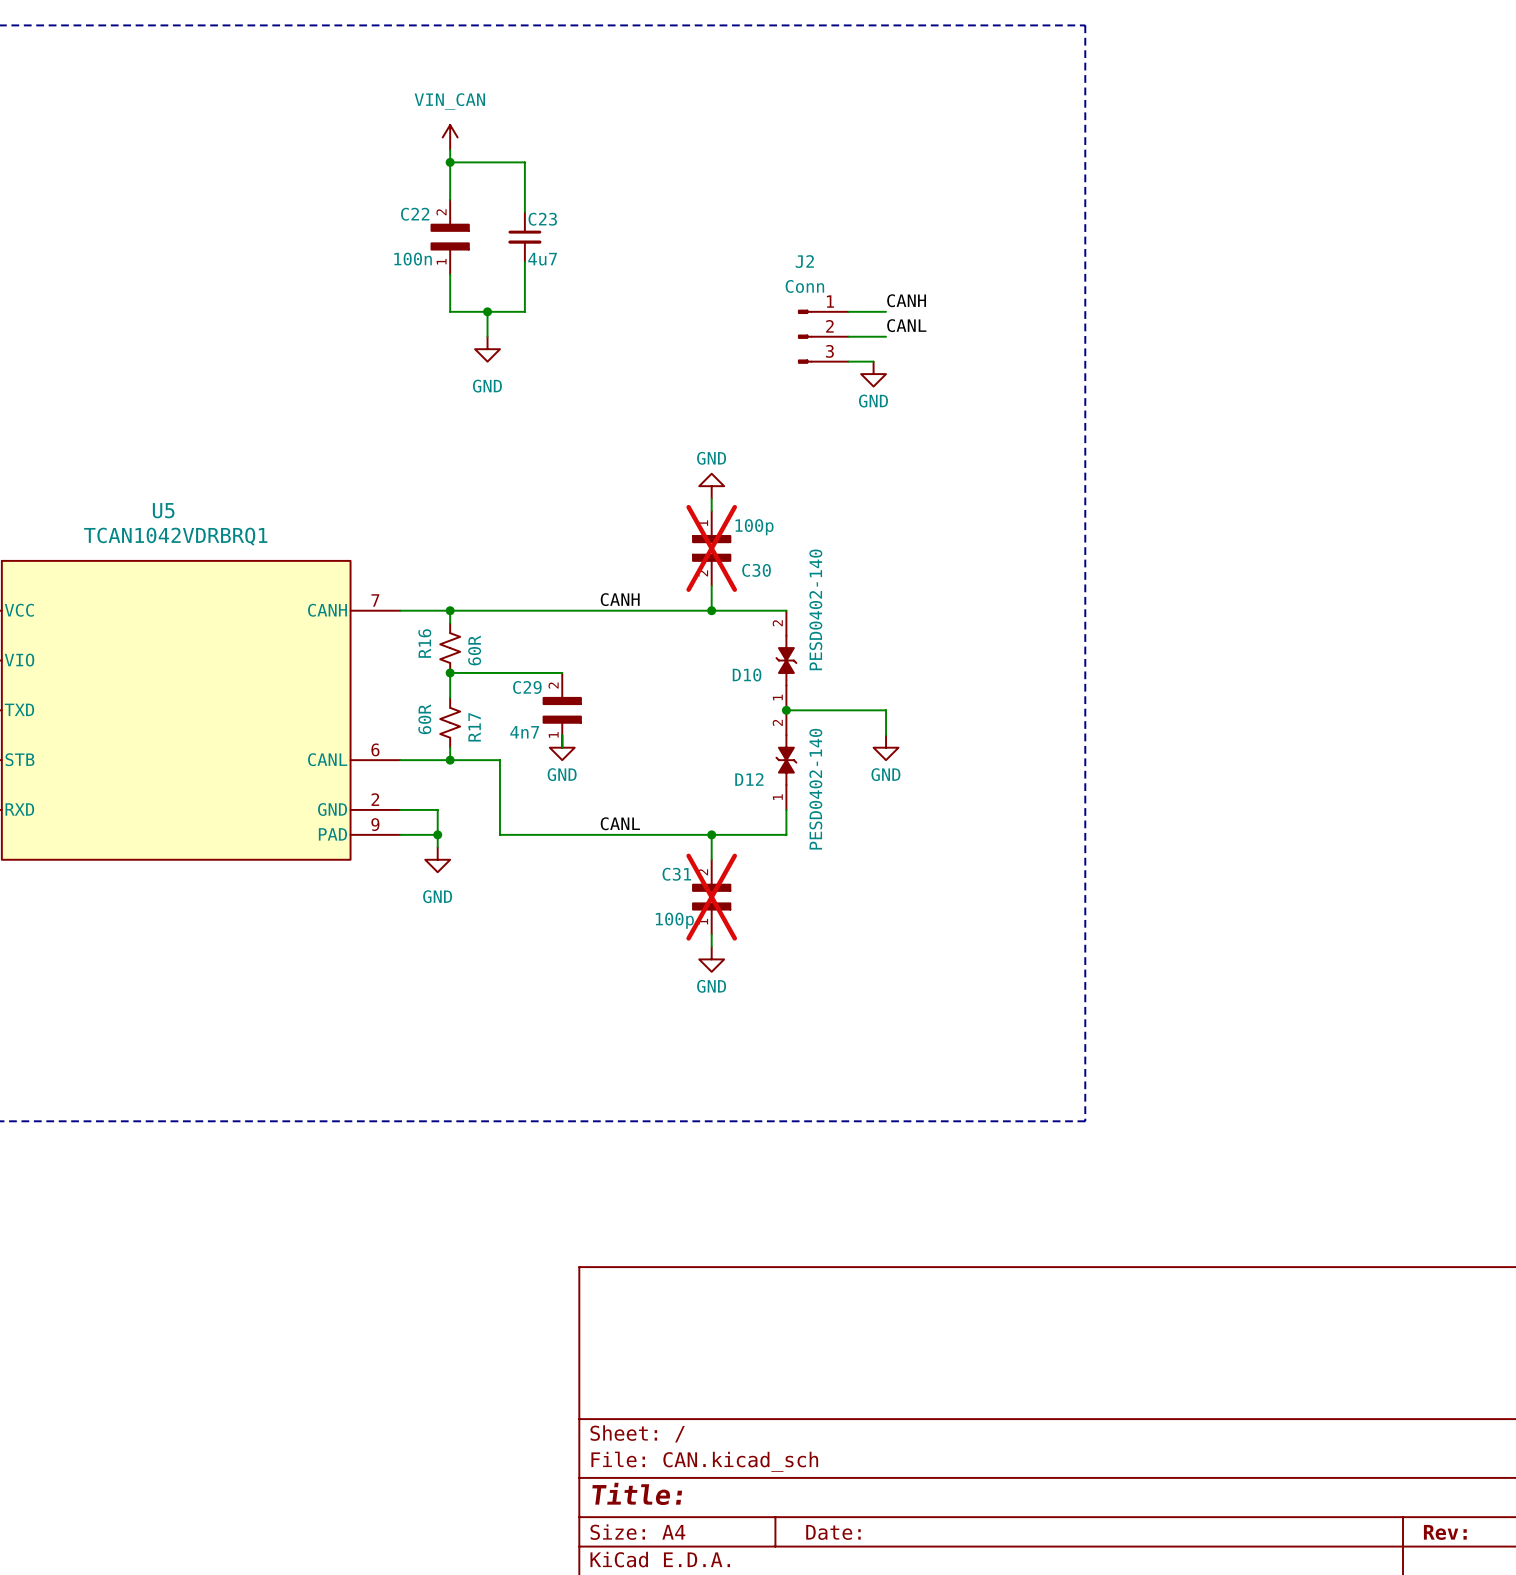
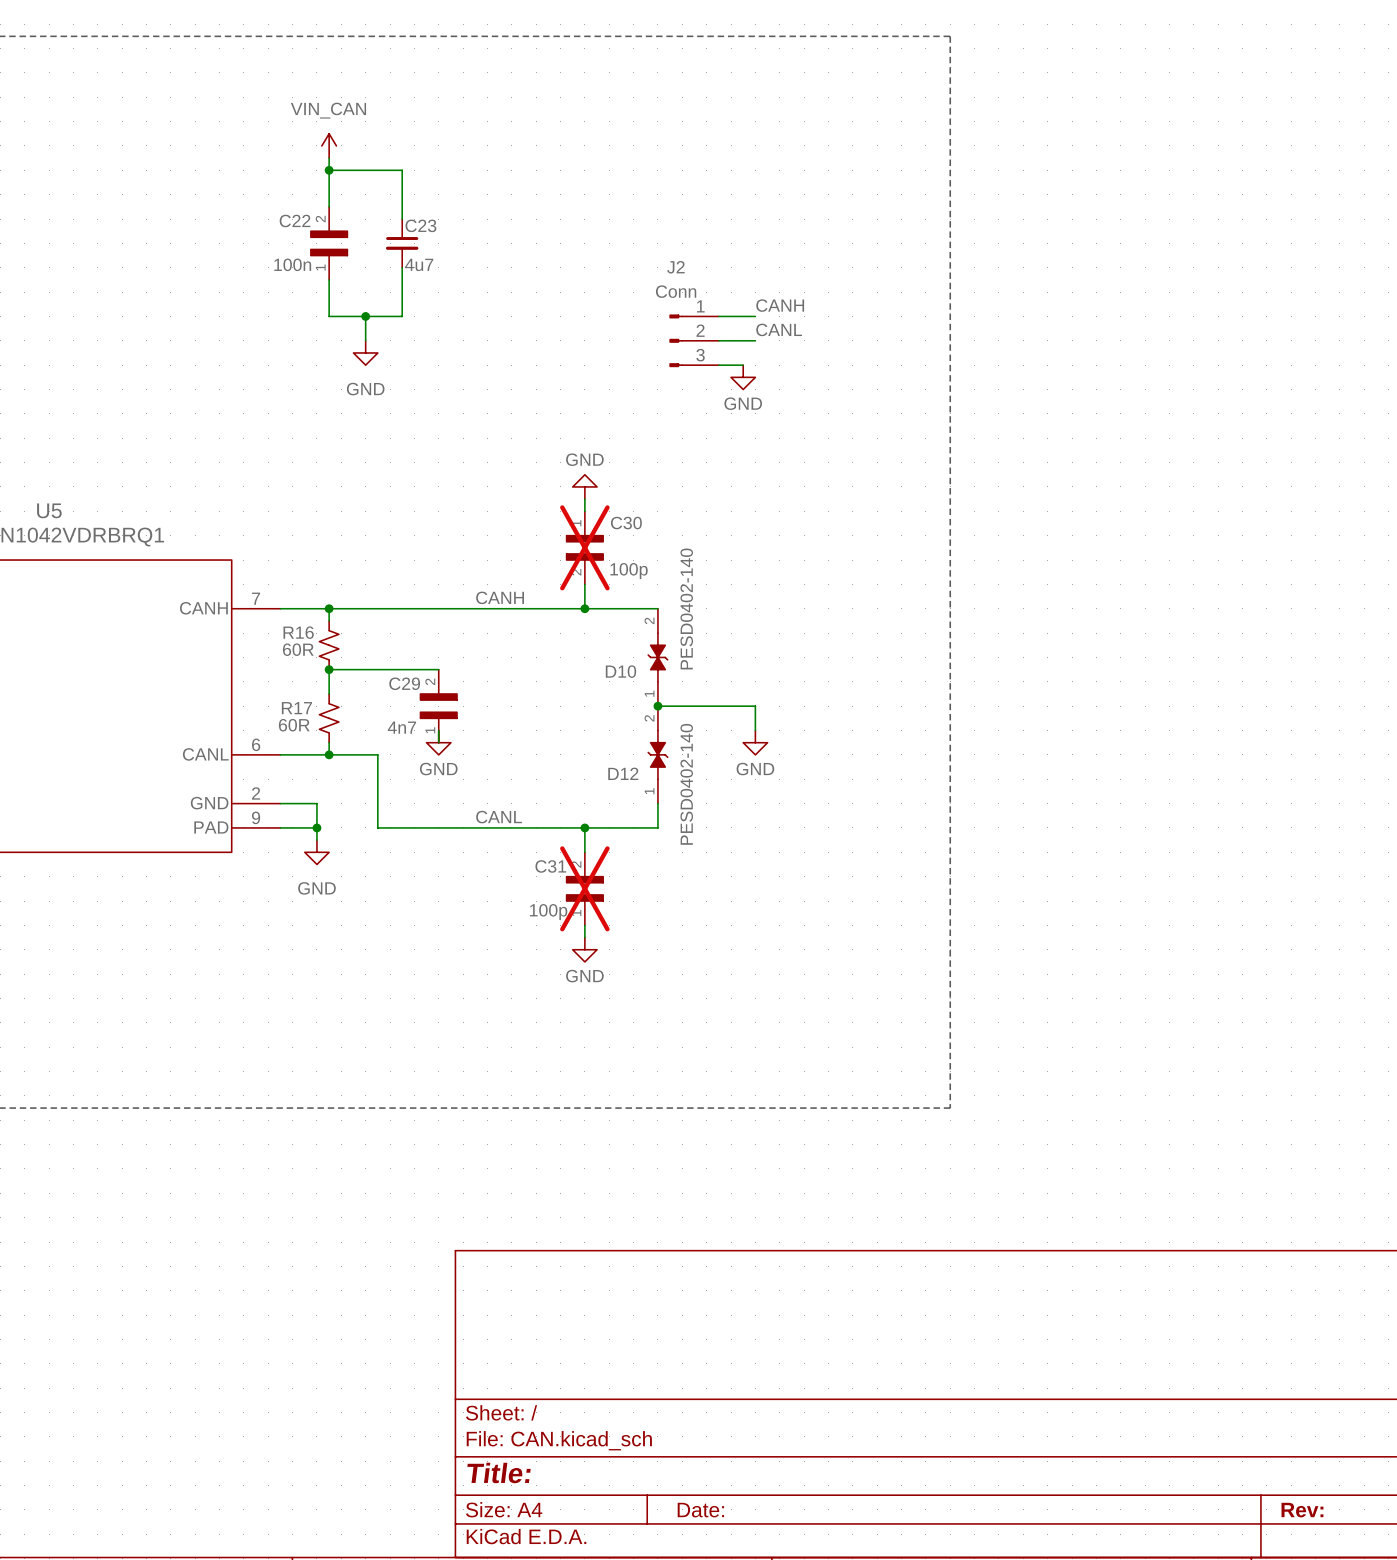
C30 value position: 100p (754, 527) -> 100p (629, 571)
C30 name position: C30 (756, 570) -> C30 (626, 523)
R16 name rotation: 0° (424, 643) -> 90° clockwise (298, 632)
R16 value rotation: 0° (474, 650) -> 90° clockwise (298, 649)
R16 value position: 60R (474, 650) -> 60R (298, 649)
R17 value rotation: 0° (424, 719) -> 90° clockwise (294, 725)
R17 name rotation: 0° (474, 727) -> 90° clockwise (296, 708)
R17 name position: R17 (474, 727) -> R17 (296, 708)

